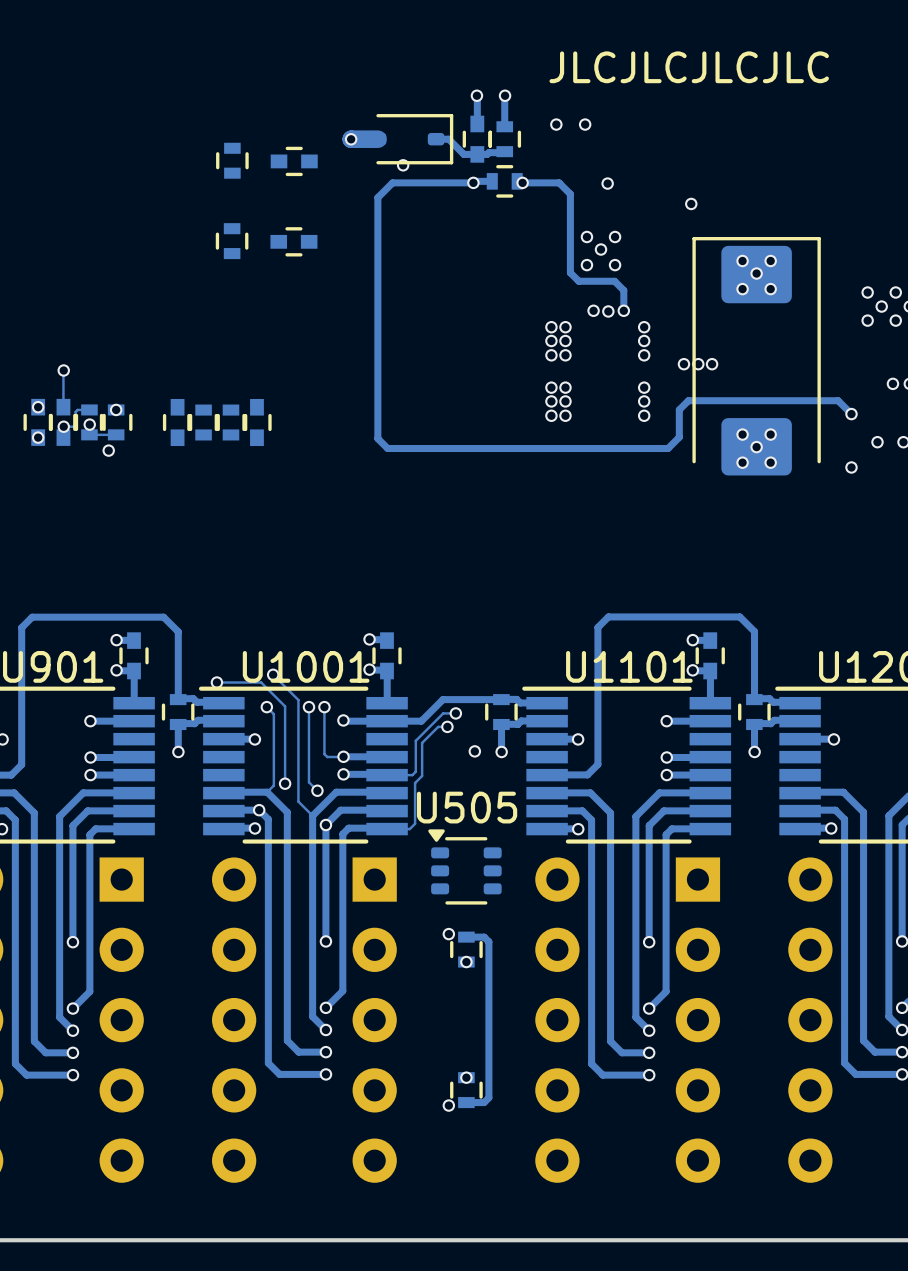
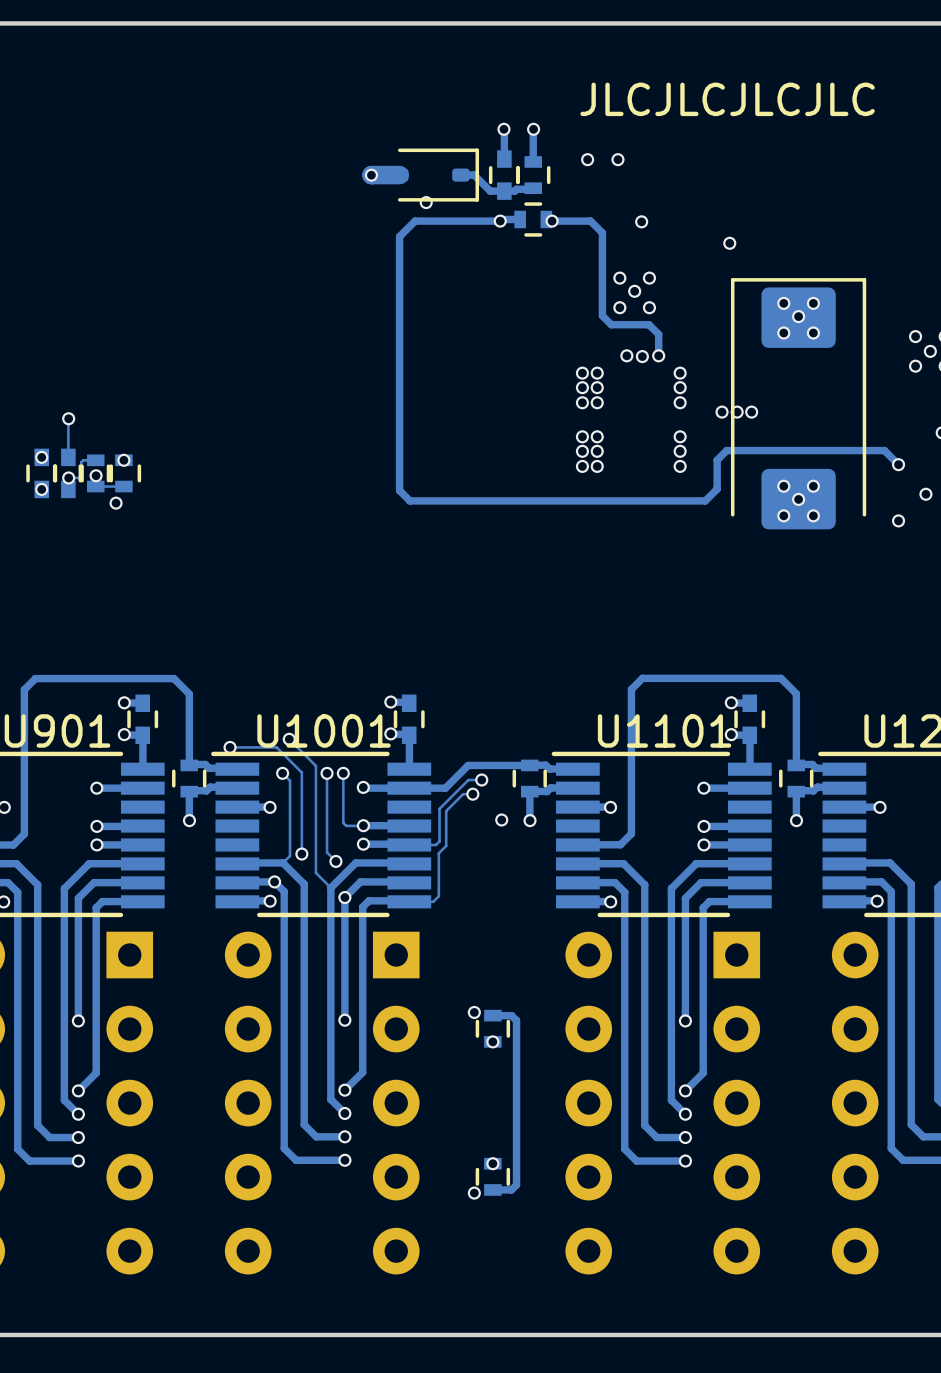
part: (232, 160) -> none
part: (294, 161) -> none
part: (232, 241) -> none
part: (293, 241) -> none
part: (177, 422) -> none
part: (203, 422) -> none
part: (230, 422) -> none
part: (256, 422) -> none
U505: (464, 866) -> none

